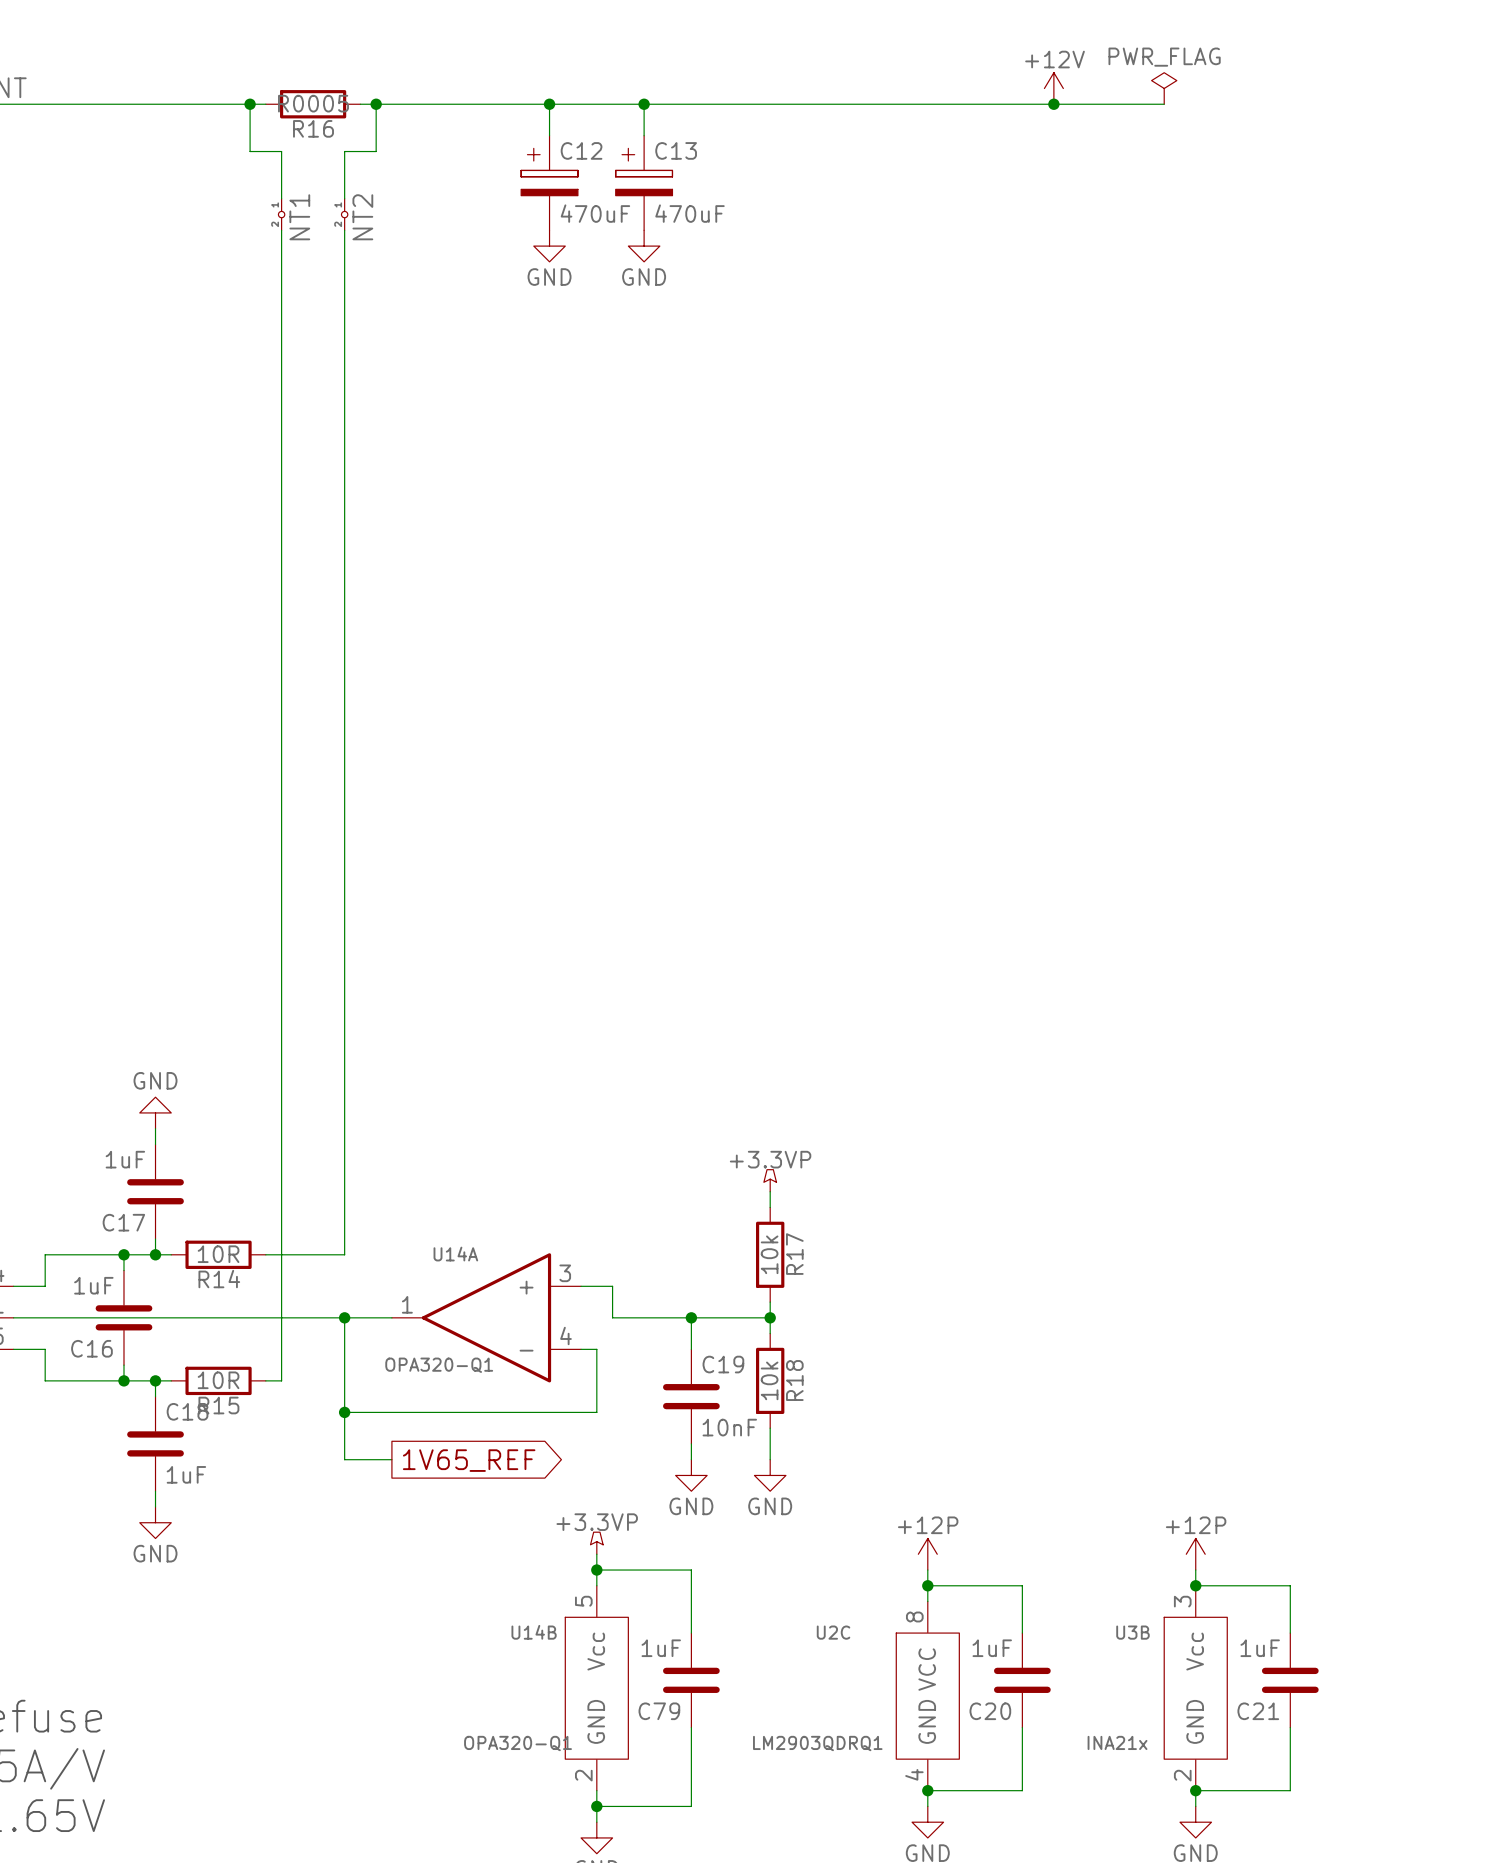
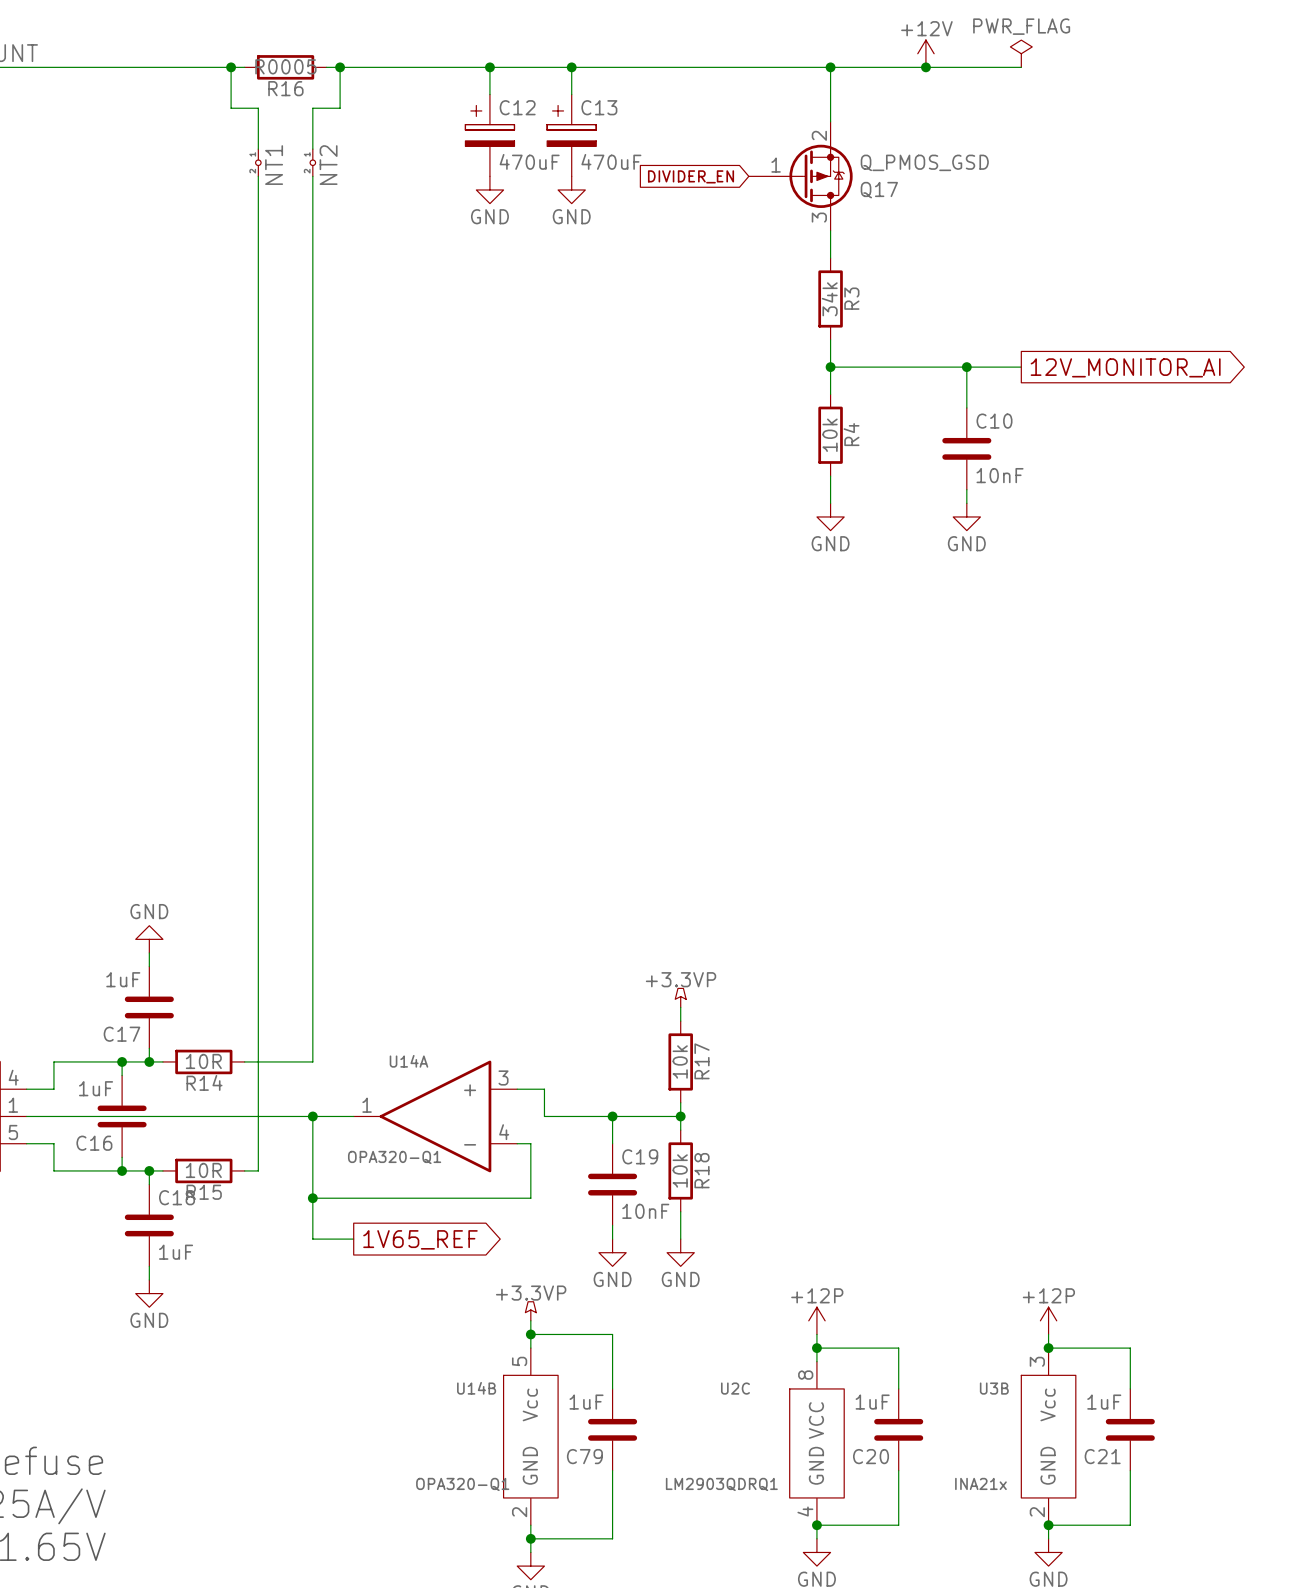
wire: none -> (830, 67) (830, 121)
junction: none -> (830, 67)
global label: none -> DIVIDER_EN (691, 176)
Q17: none -> Q_PMOS_GSD (800, 176)
wire: none -> (830, 230) (830, 258)
R3: none -> 34k (830, 298)
wire: none -> (830, 339) (830, 394)
wire: none -> (830, 367) (1021, 367)
junction: none -> (830, 367)
wire: none -> (966, 367) (966, 407)
junction: none -> (966, 367)
global label: none -> 12V_MONITOR_AI (1125, 367)
R4: none -> 10k (830, 435)
C10: none -> 10nF (966, 448)
wire: none -> (830, 476) (830, 503)
wire: none -> (966, 489) (966, 503)
power symbol: none -> GND (830, 516)
power symbol: none -> GND (966, 516)

